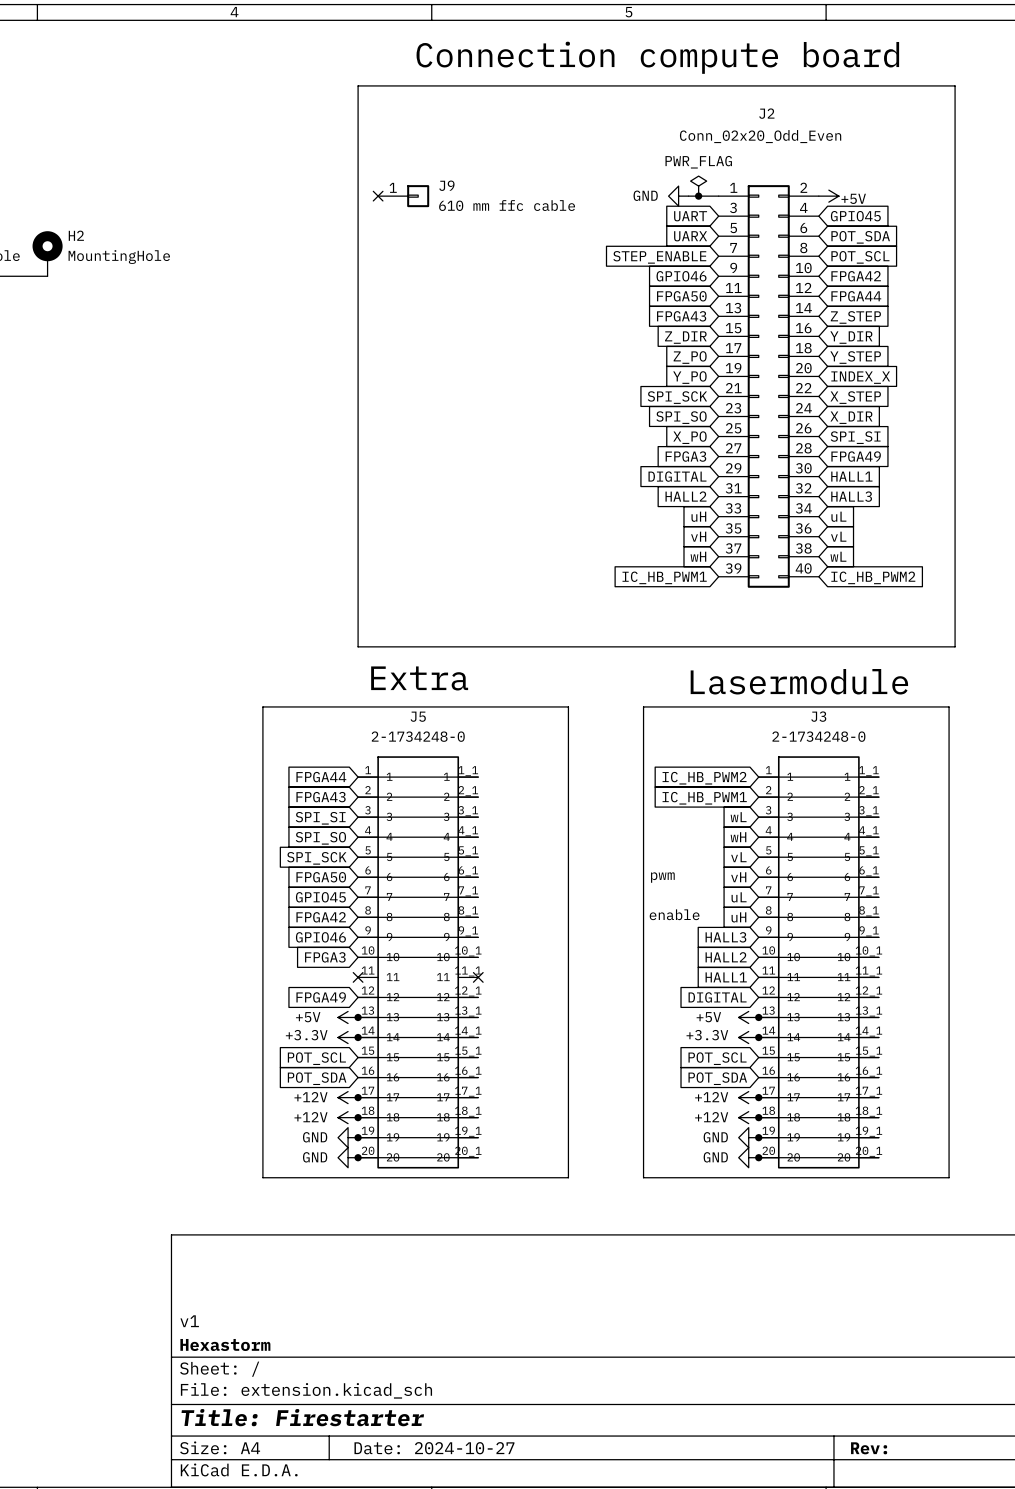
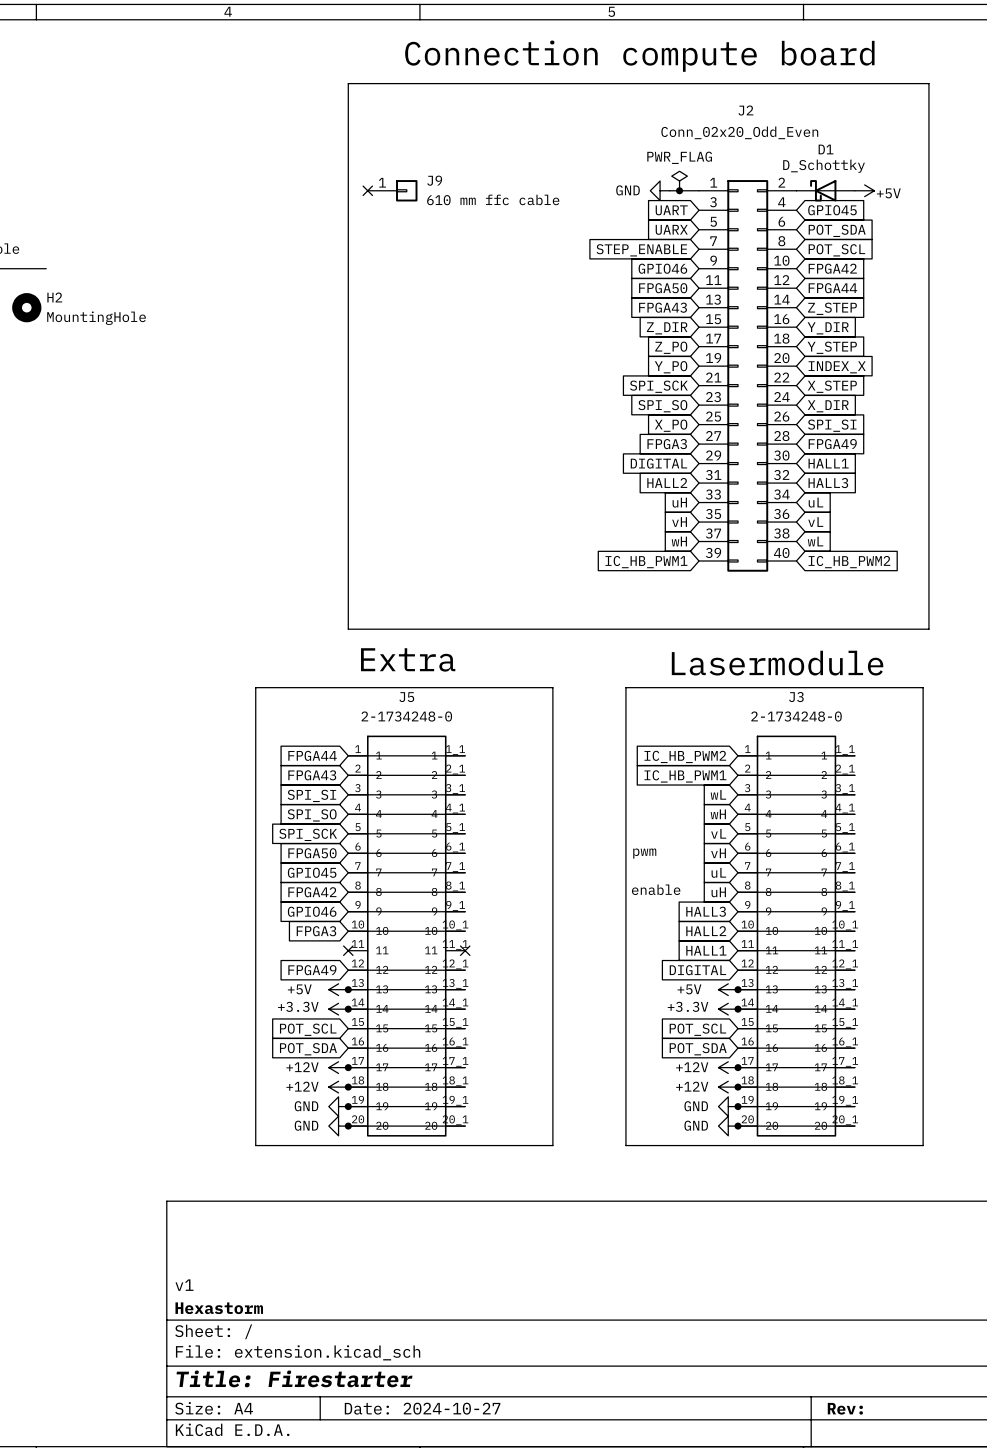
power symbol position: +5V (828, 196) -> +5V (864, 190)
D1: none -> D_Schottky (825, 190)
H2 symbol: [32, 231, 63, 277] -> [12, 293, 42, 323]

